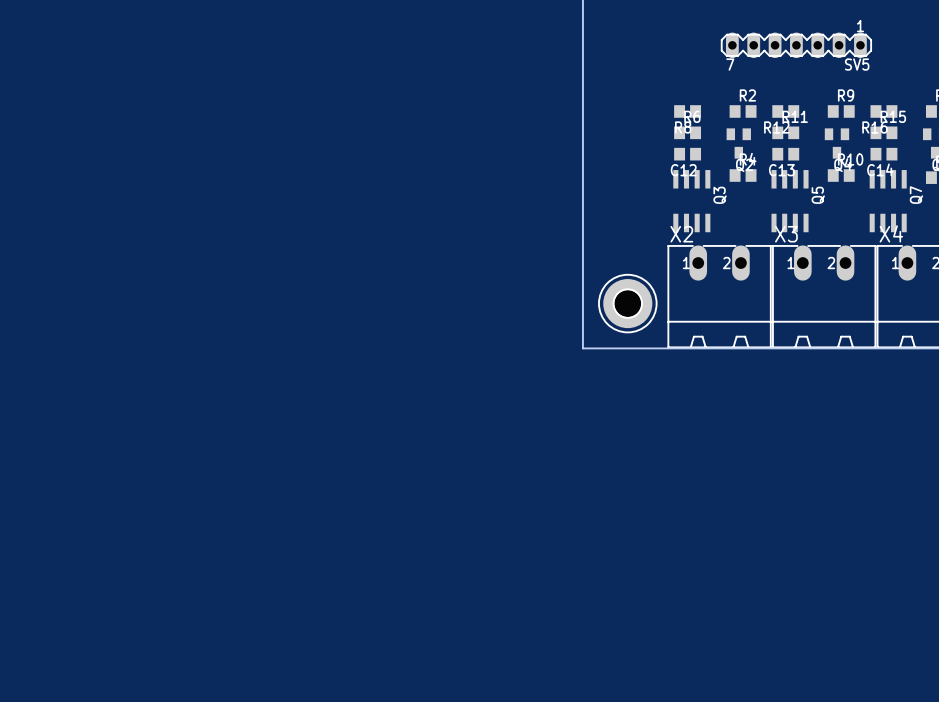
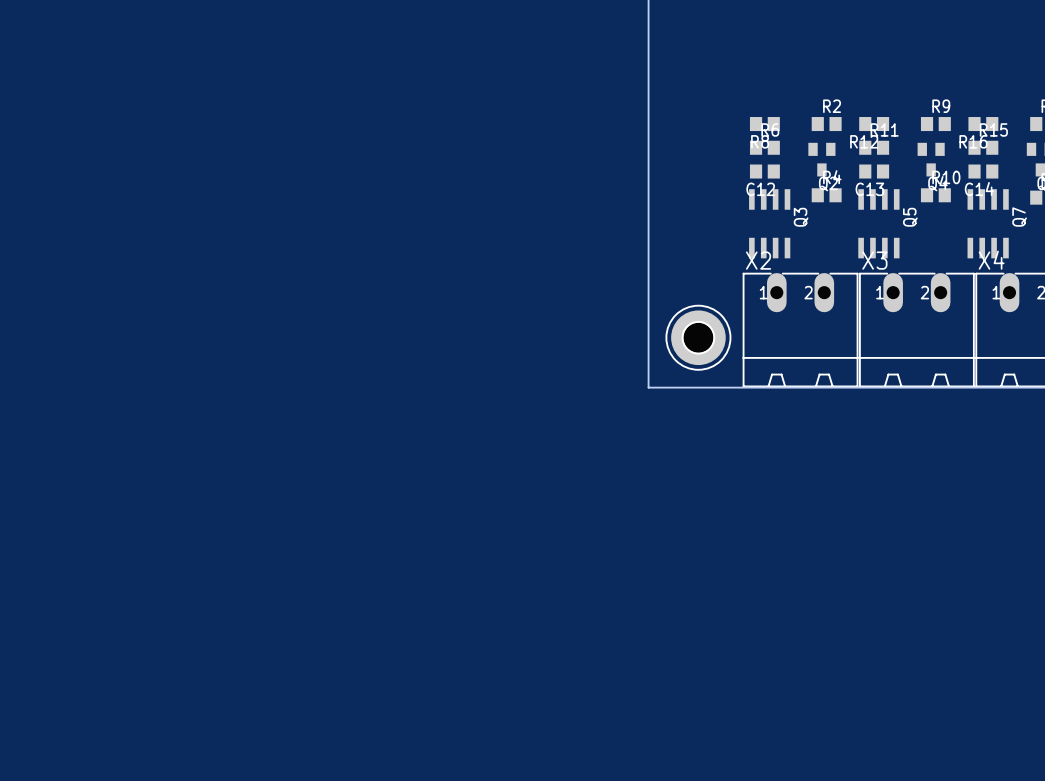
SV5: (796, 45) -> none

